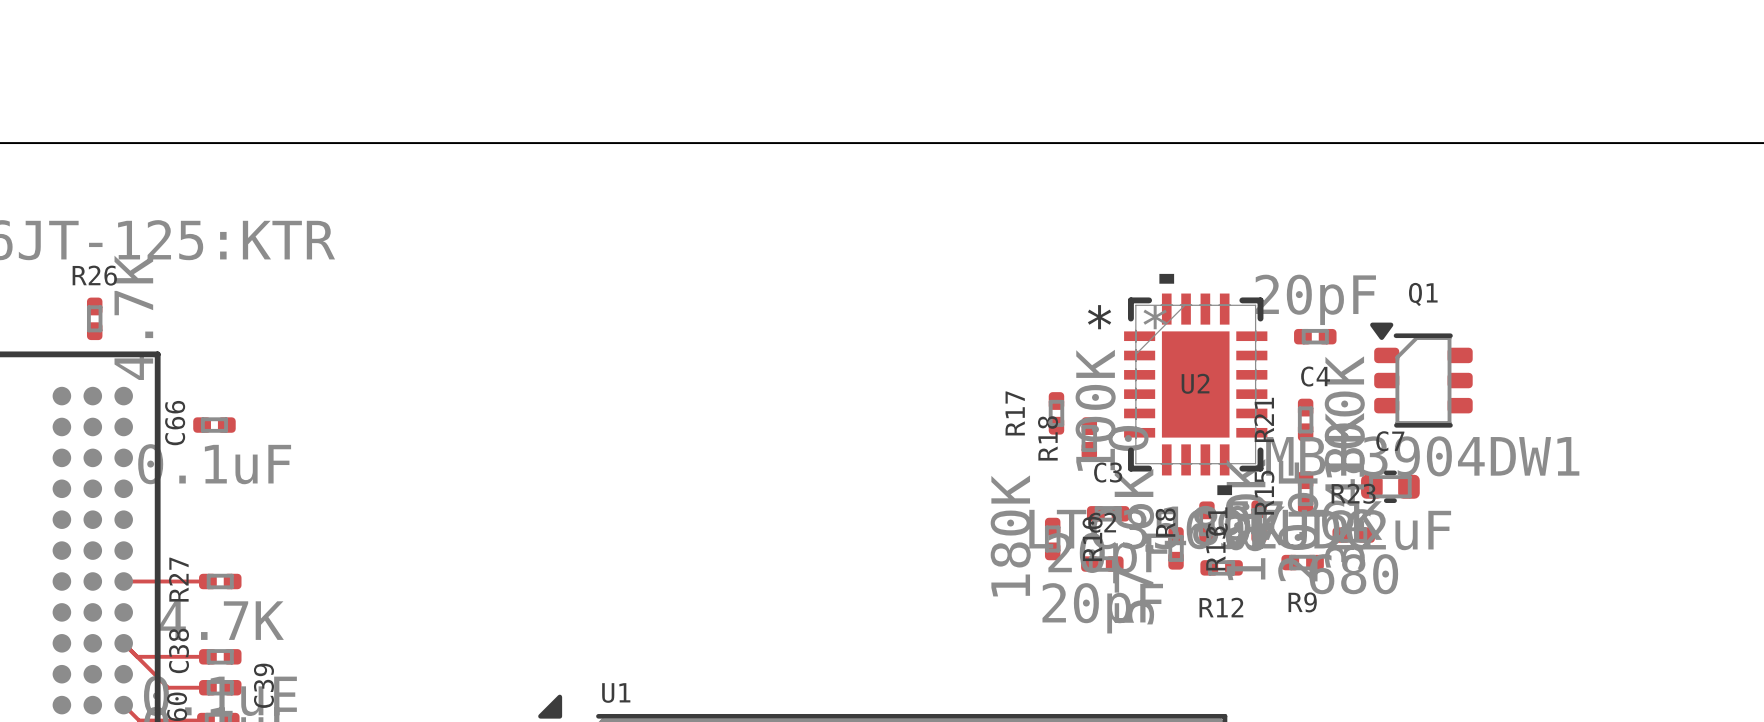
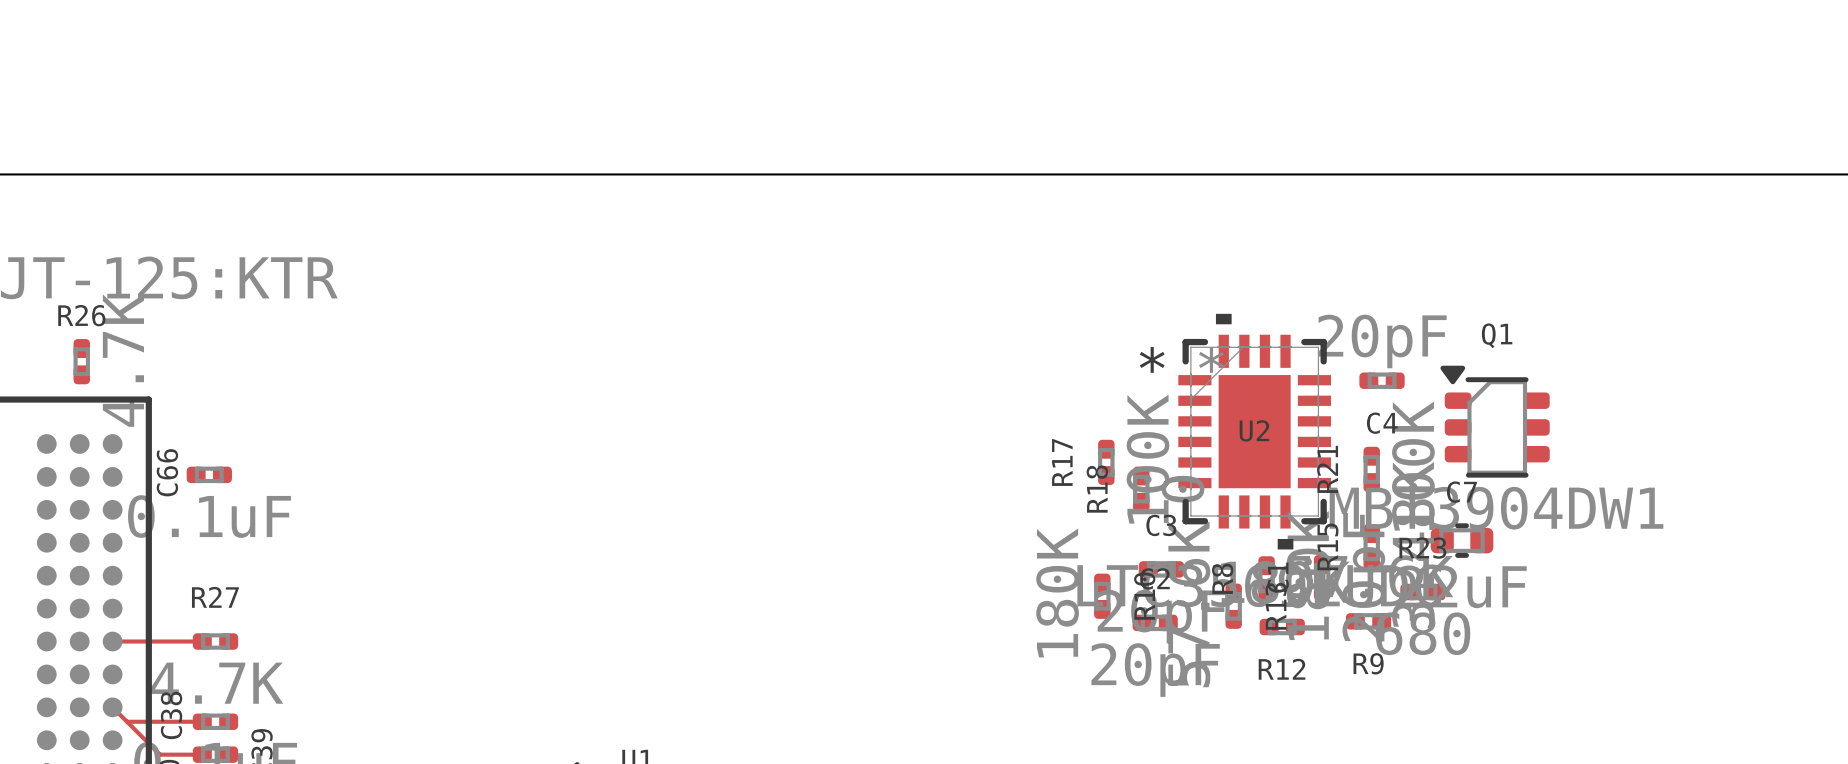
R27 name rotation: 0° (178, 579) -> 90° clockwise (215, 597)

